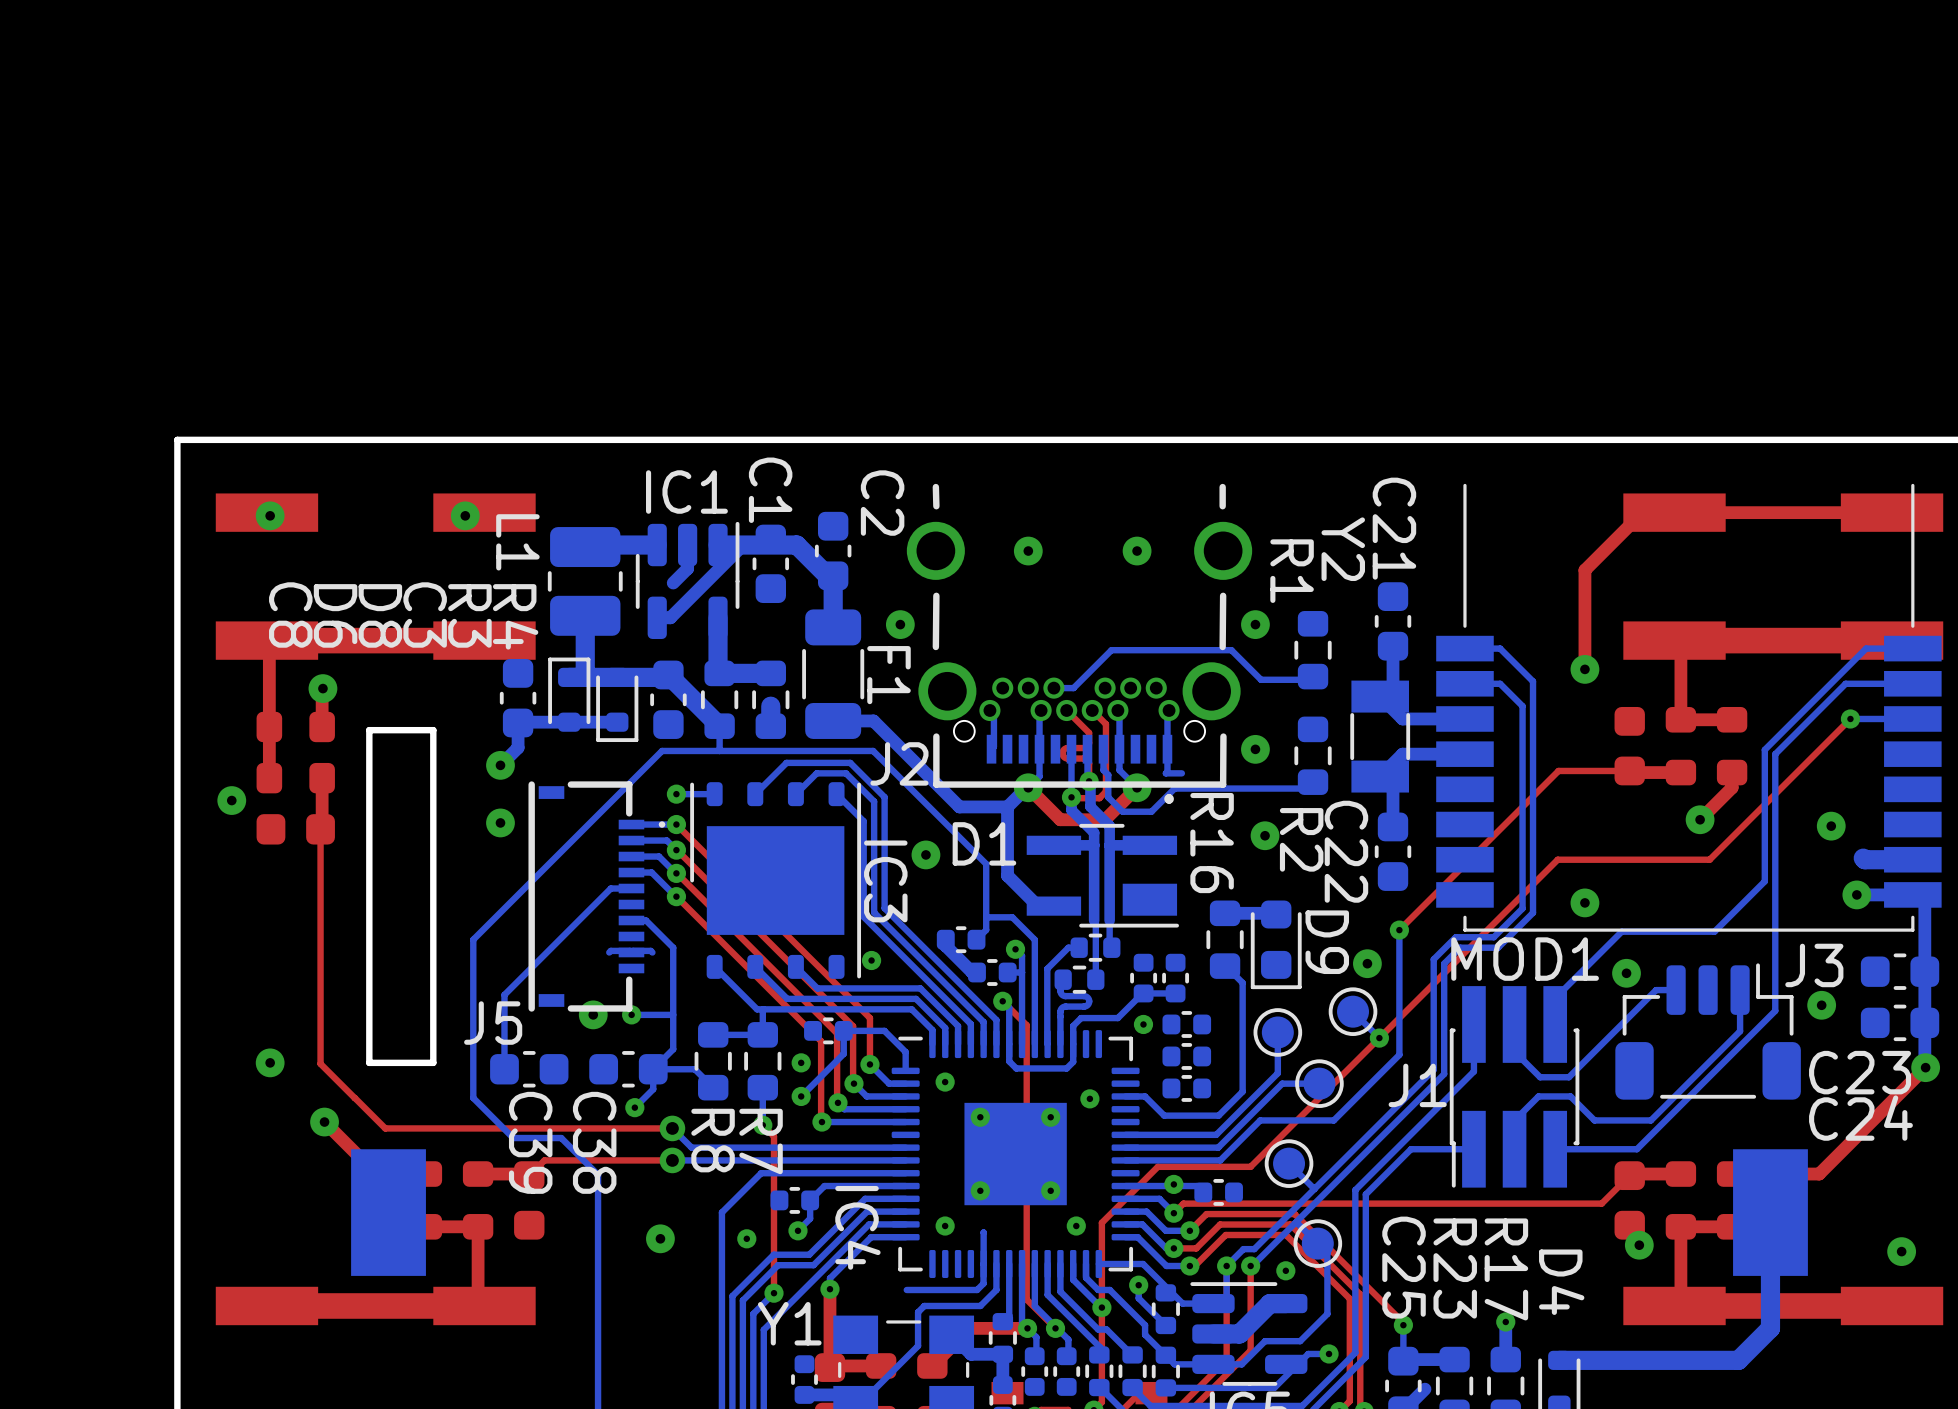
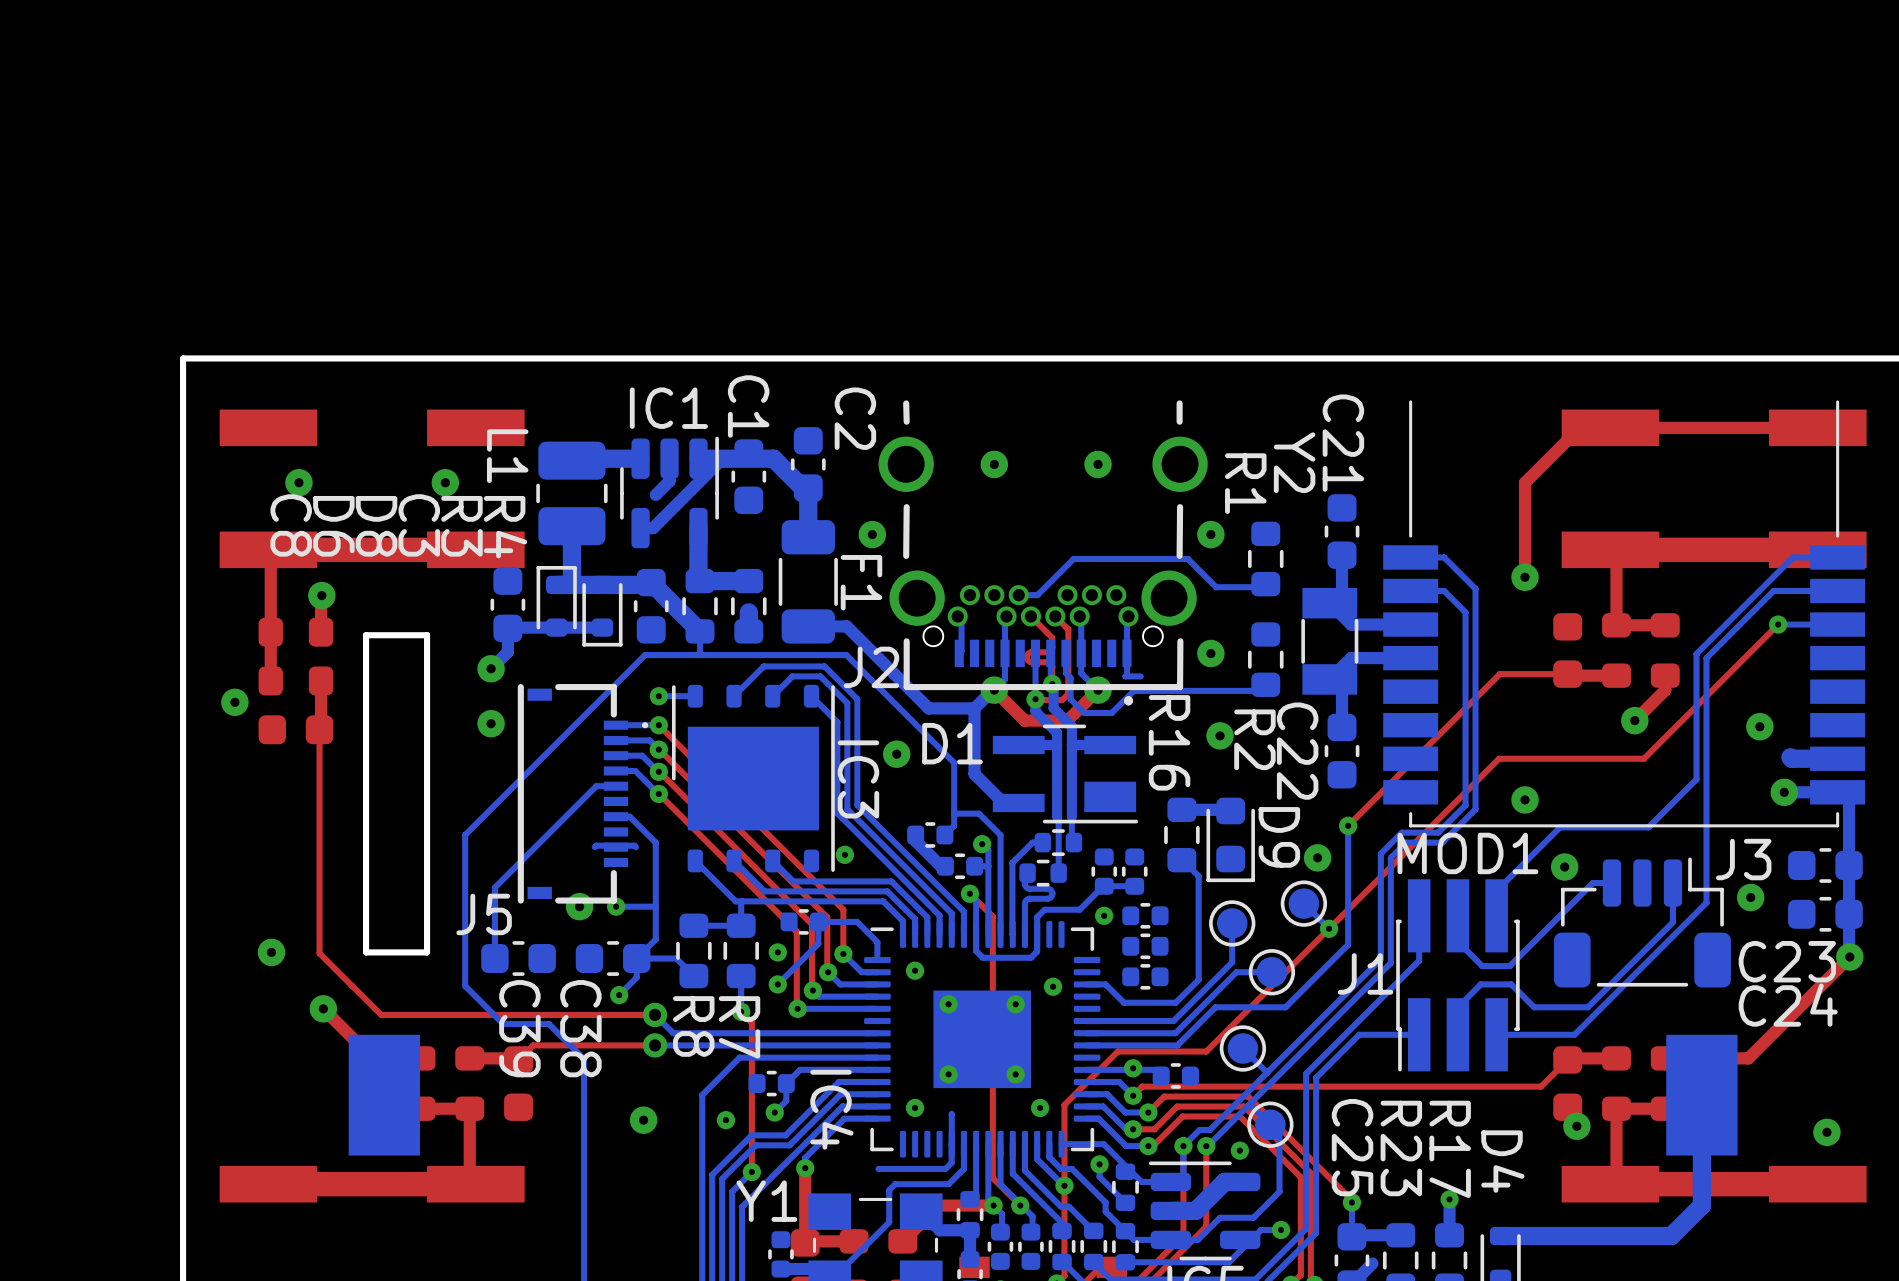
via position: (270, 515) -> (298, 482)
via position: (465, 515) -> (445, 482)

